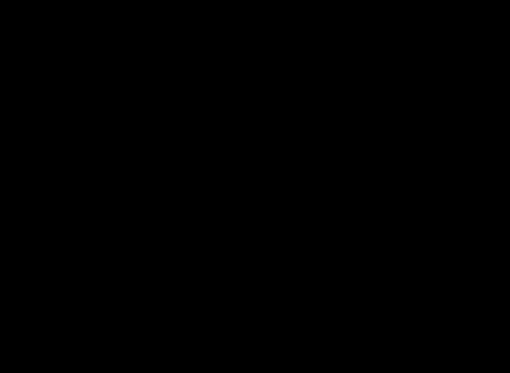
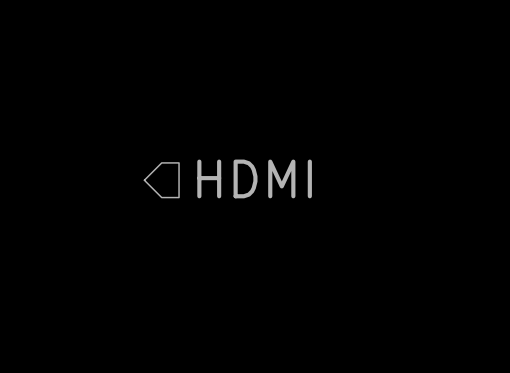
hierarchical label: none -> HDMI (254, 178)

